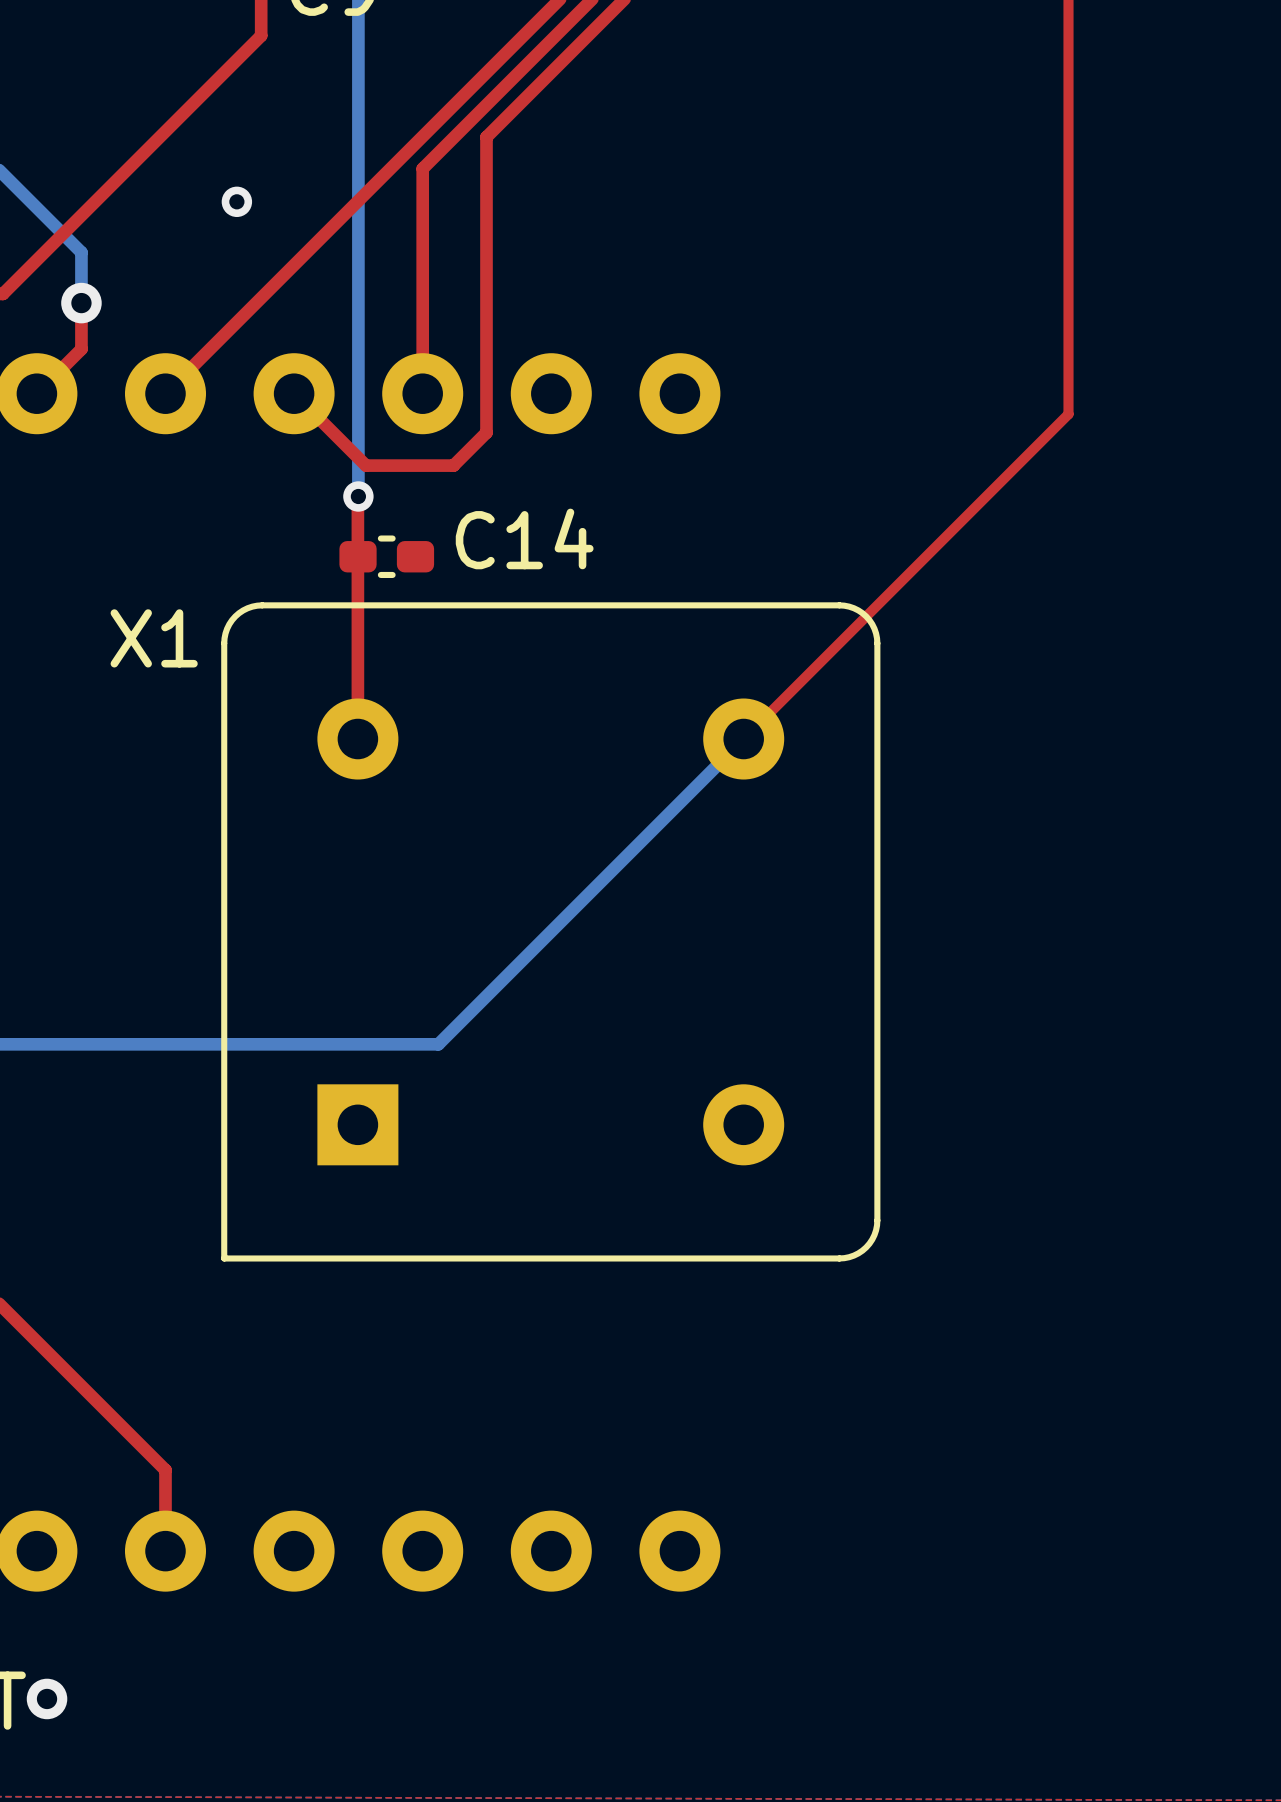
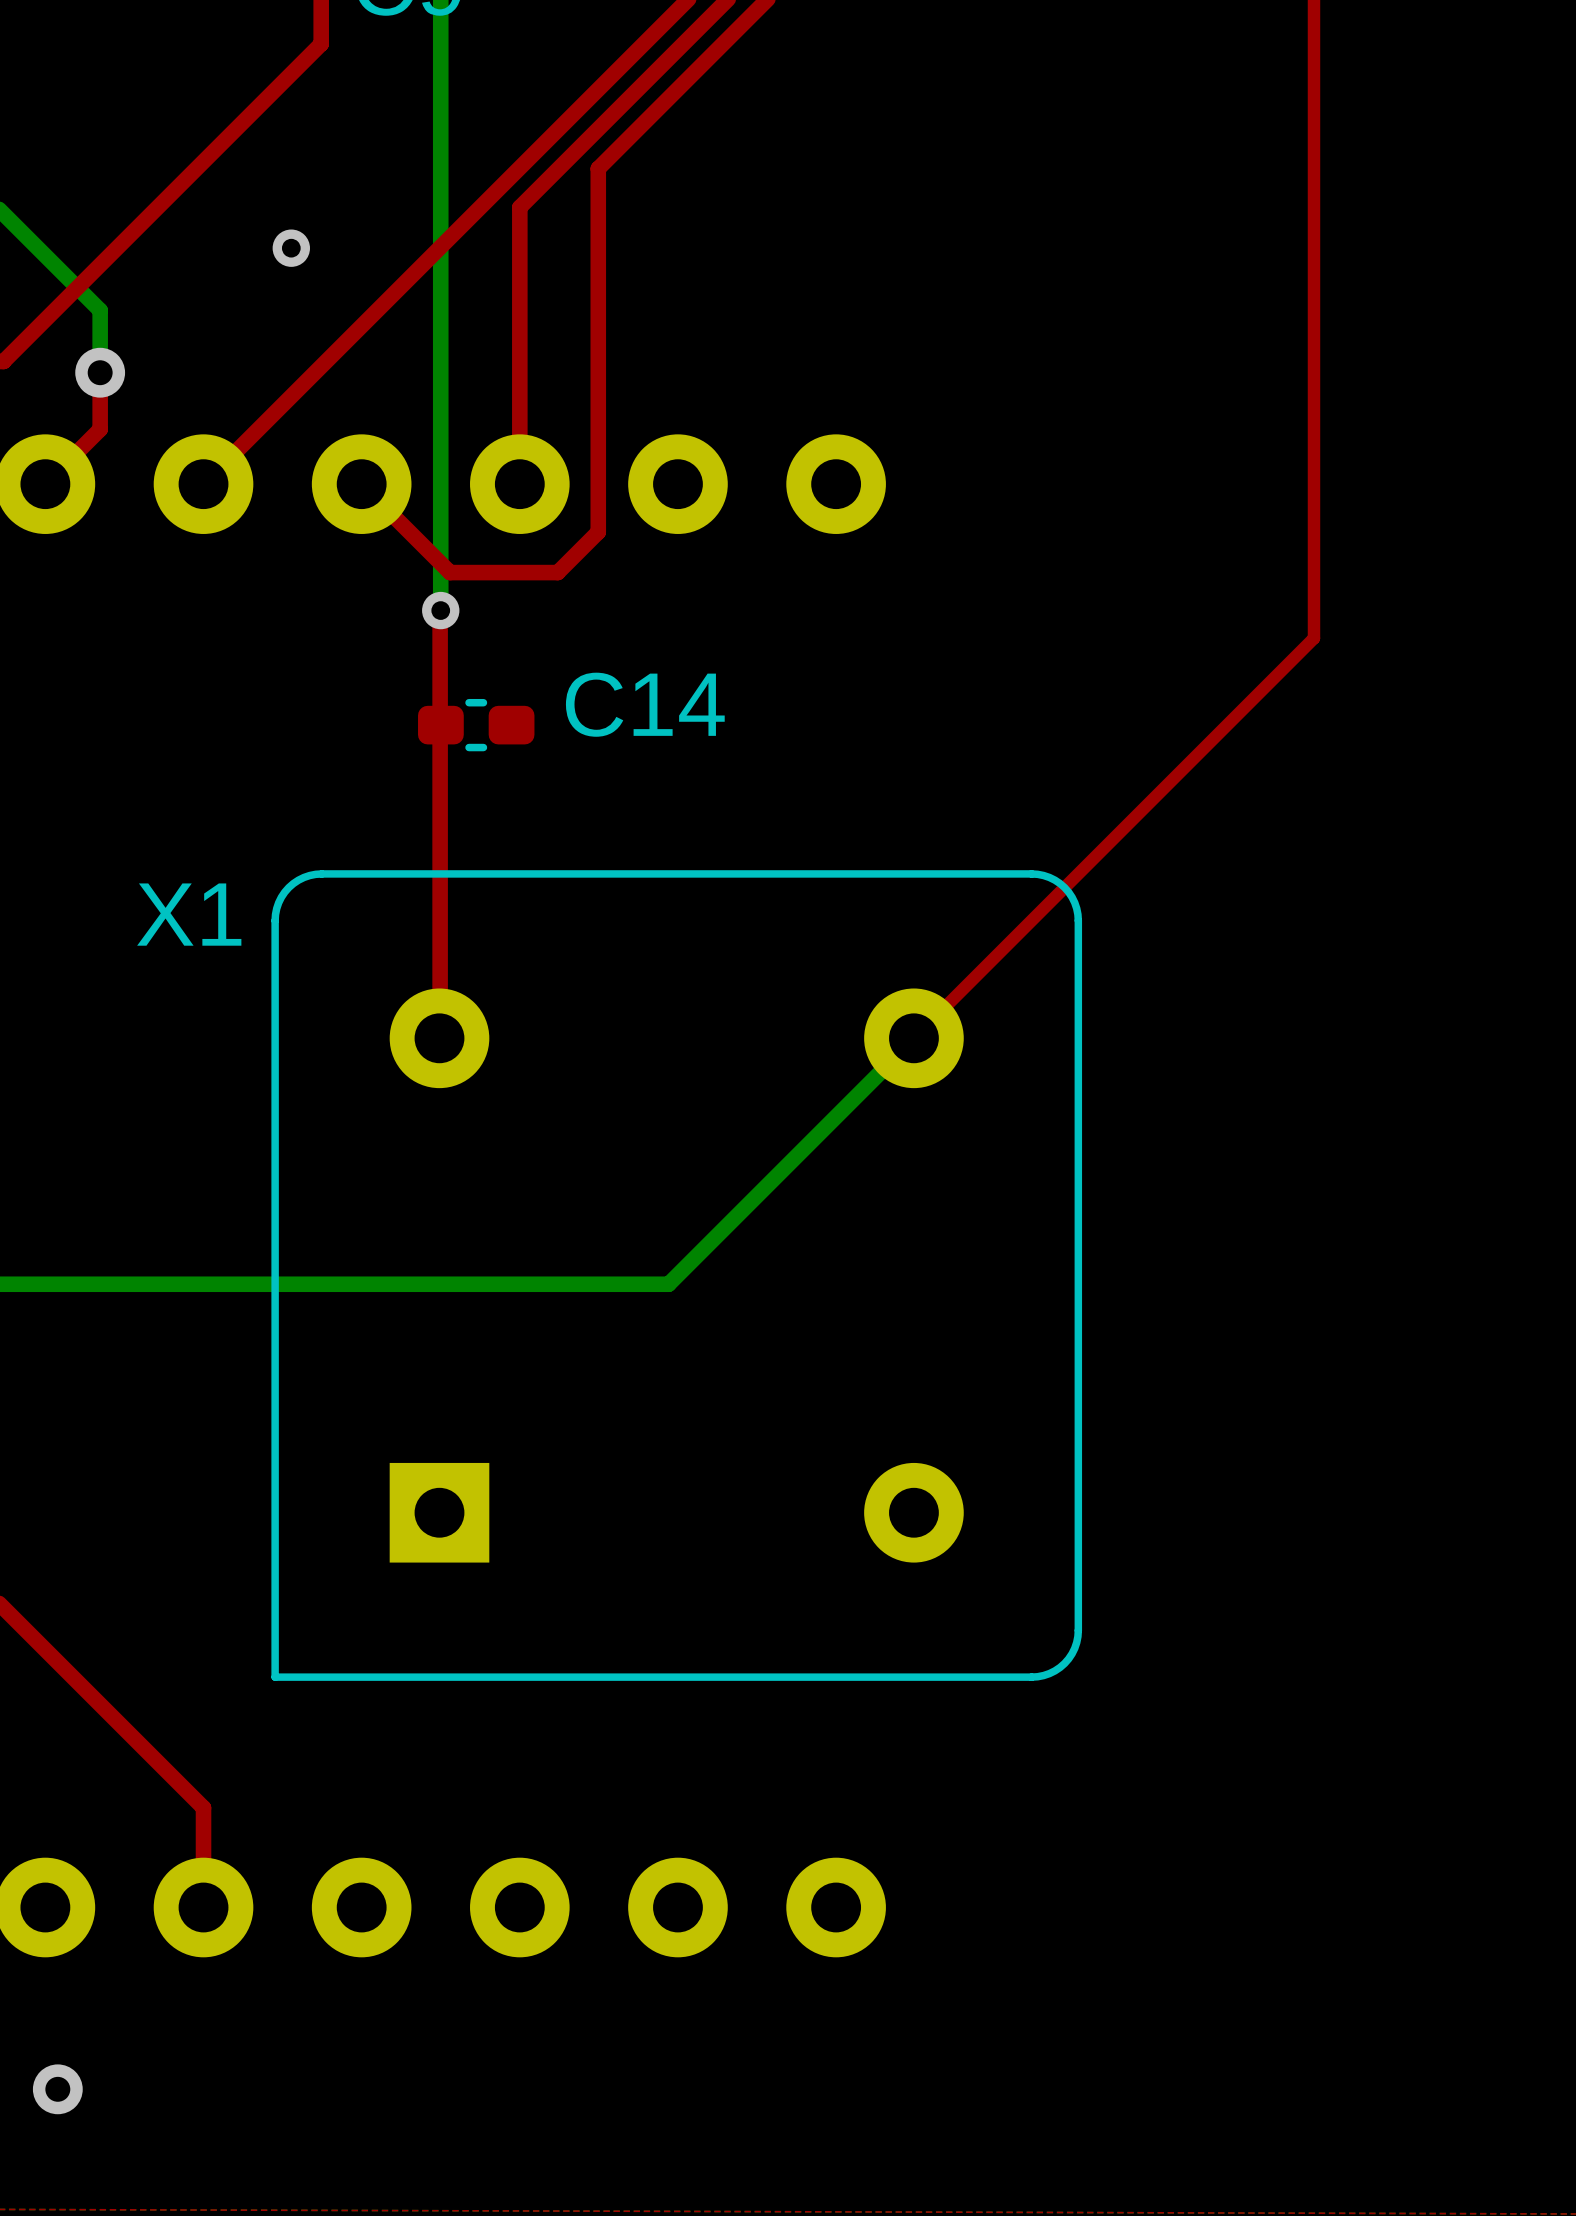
top track: (1068, 414) (743, 739) -> (1313, 509) (1313, 638) (913, 1038)
C14 position: (386, 556) -> (476, 725)
top track: none -> (440, 908) (440, 1037)
bottom track: (743, 739) (438, 1044) -> (913, 1038) (668, 1284) (539, 1284)
X1 position: (550, 931) -> (676, 1275)

